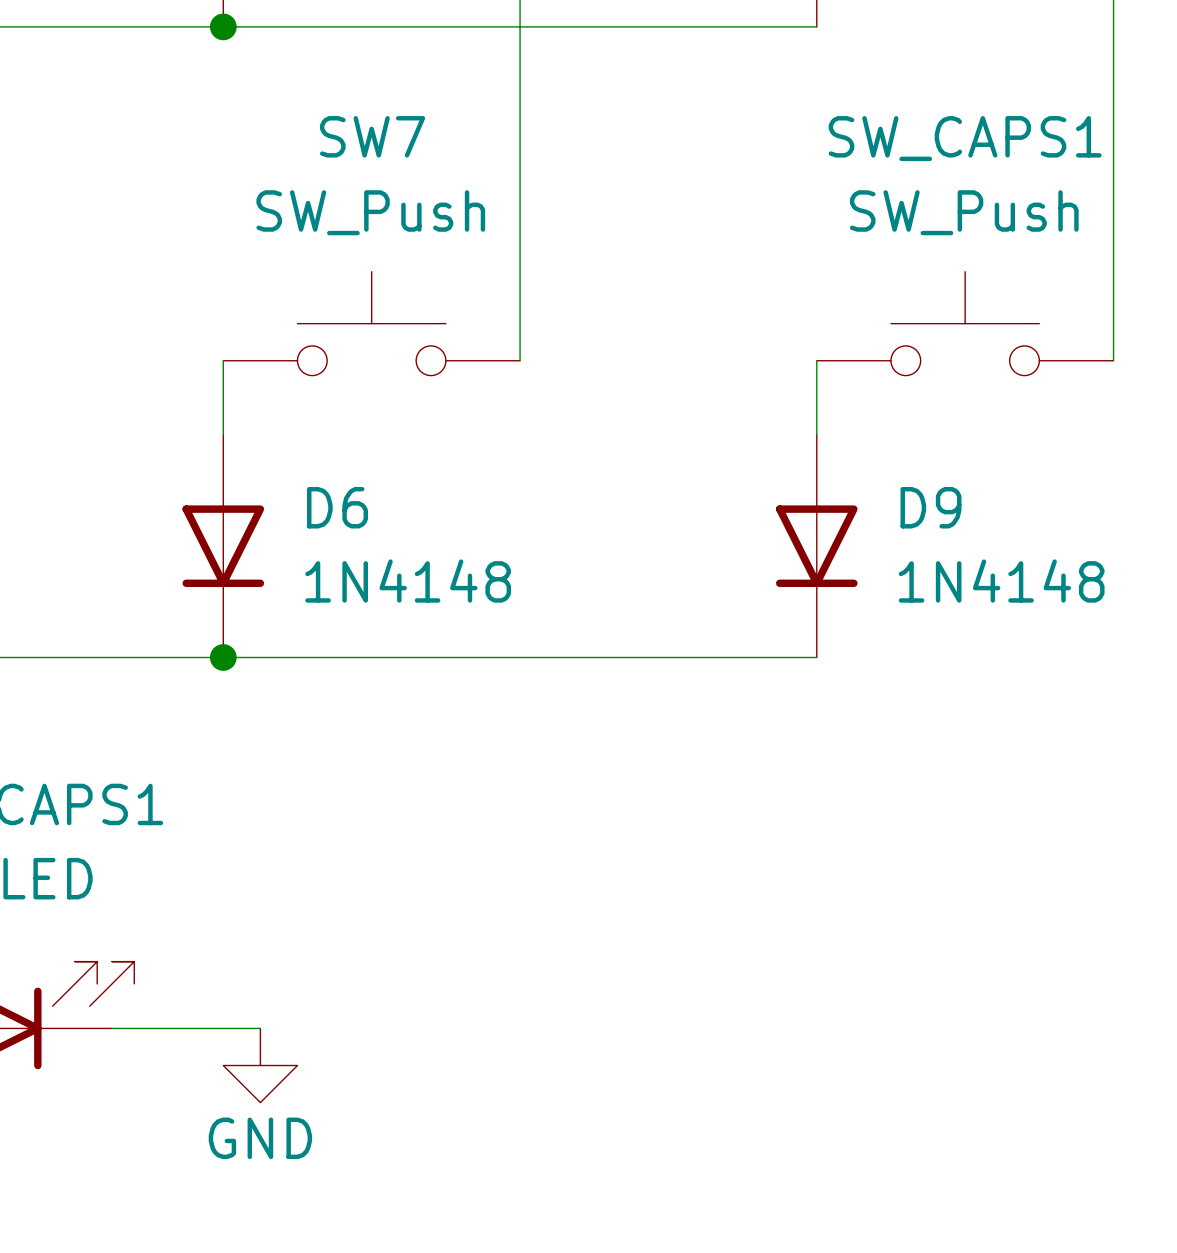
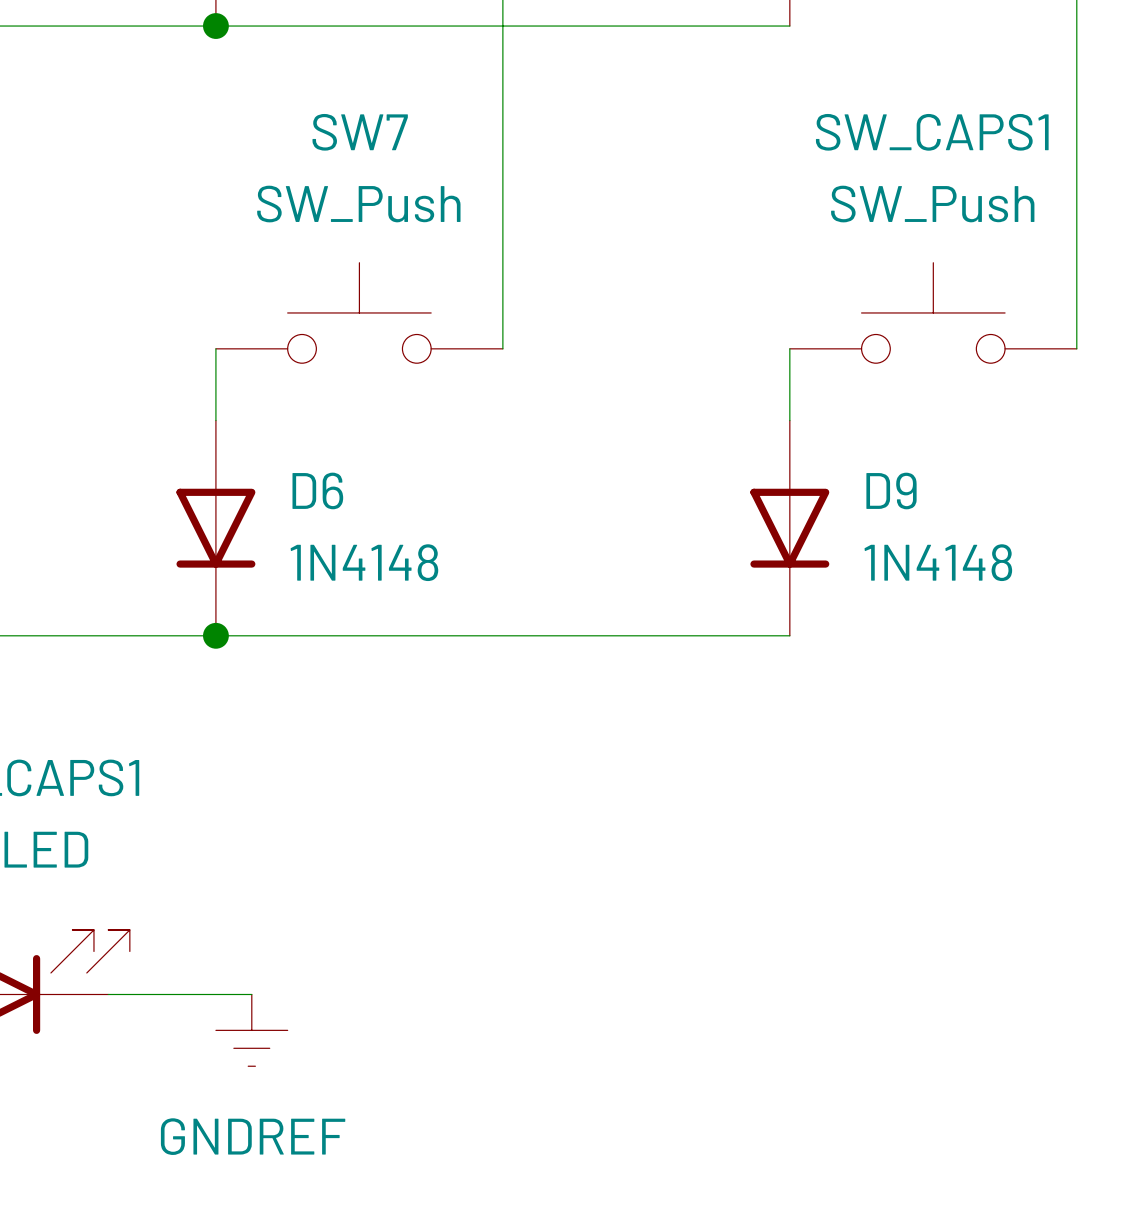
power symbol: GND (260, 1065) -> GNDREF (251, 1030)

